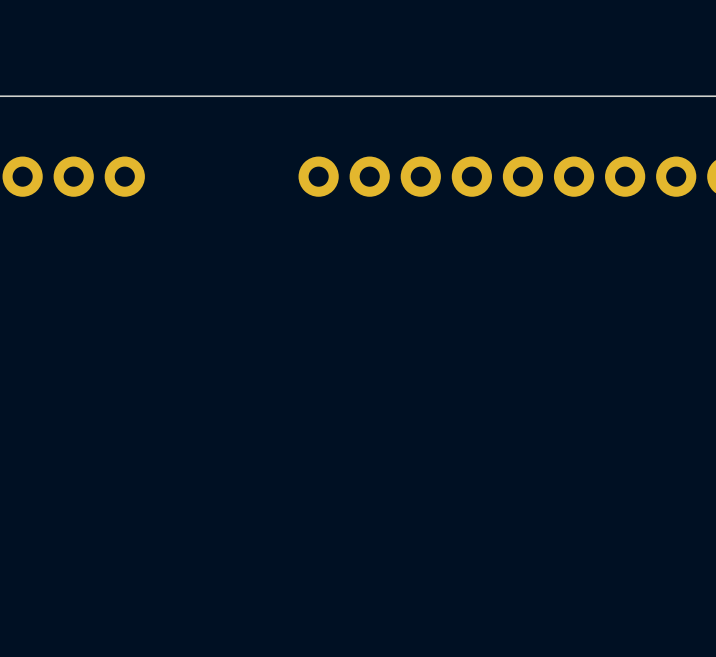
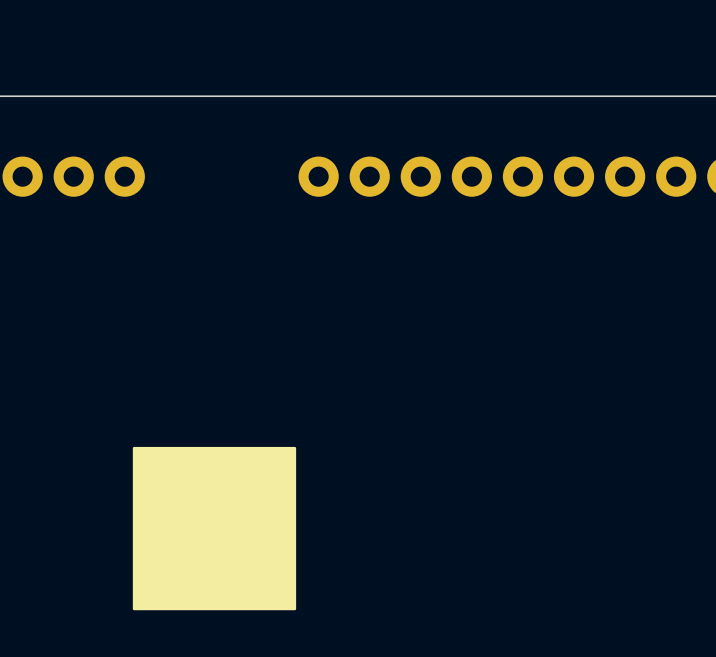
drawing: none -> [132, 446, 297, 611]

